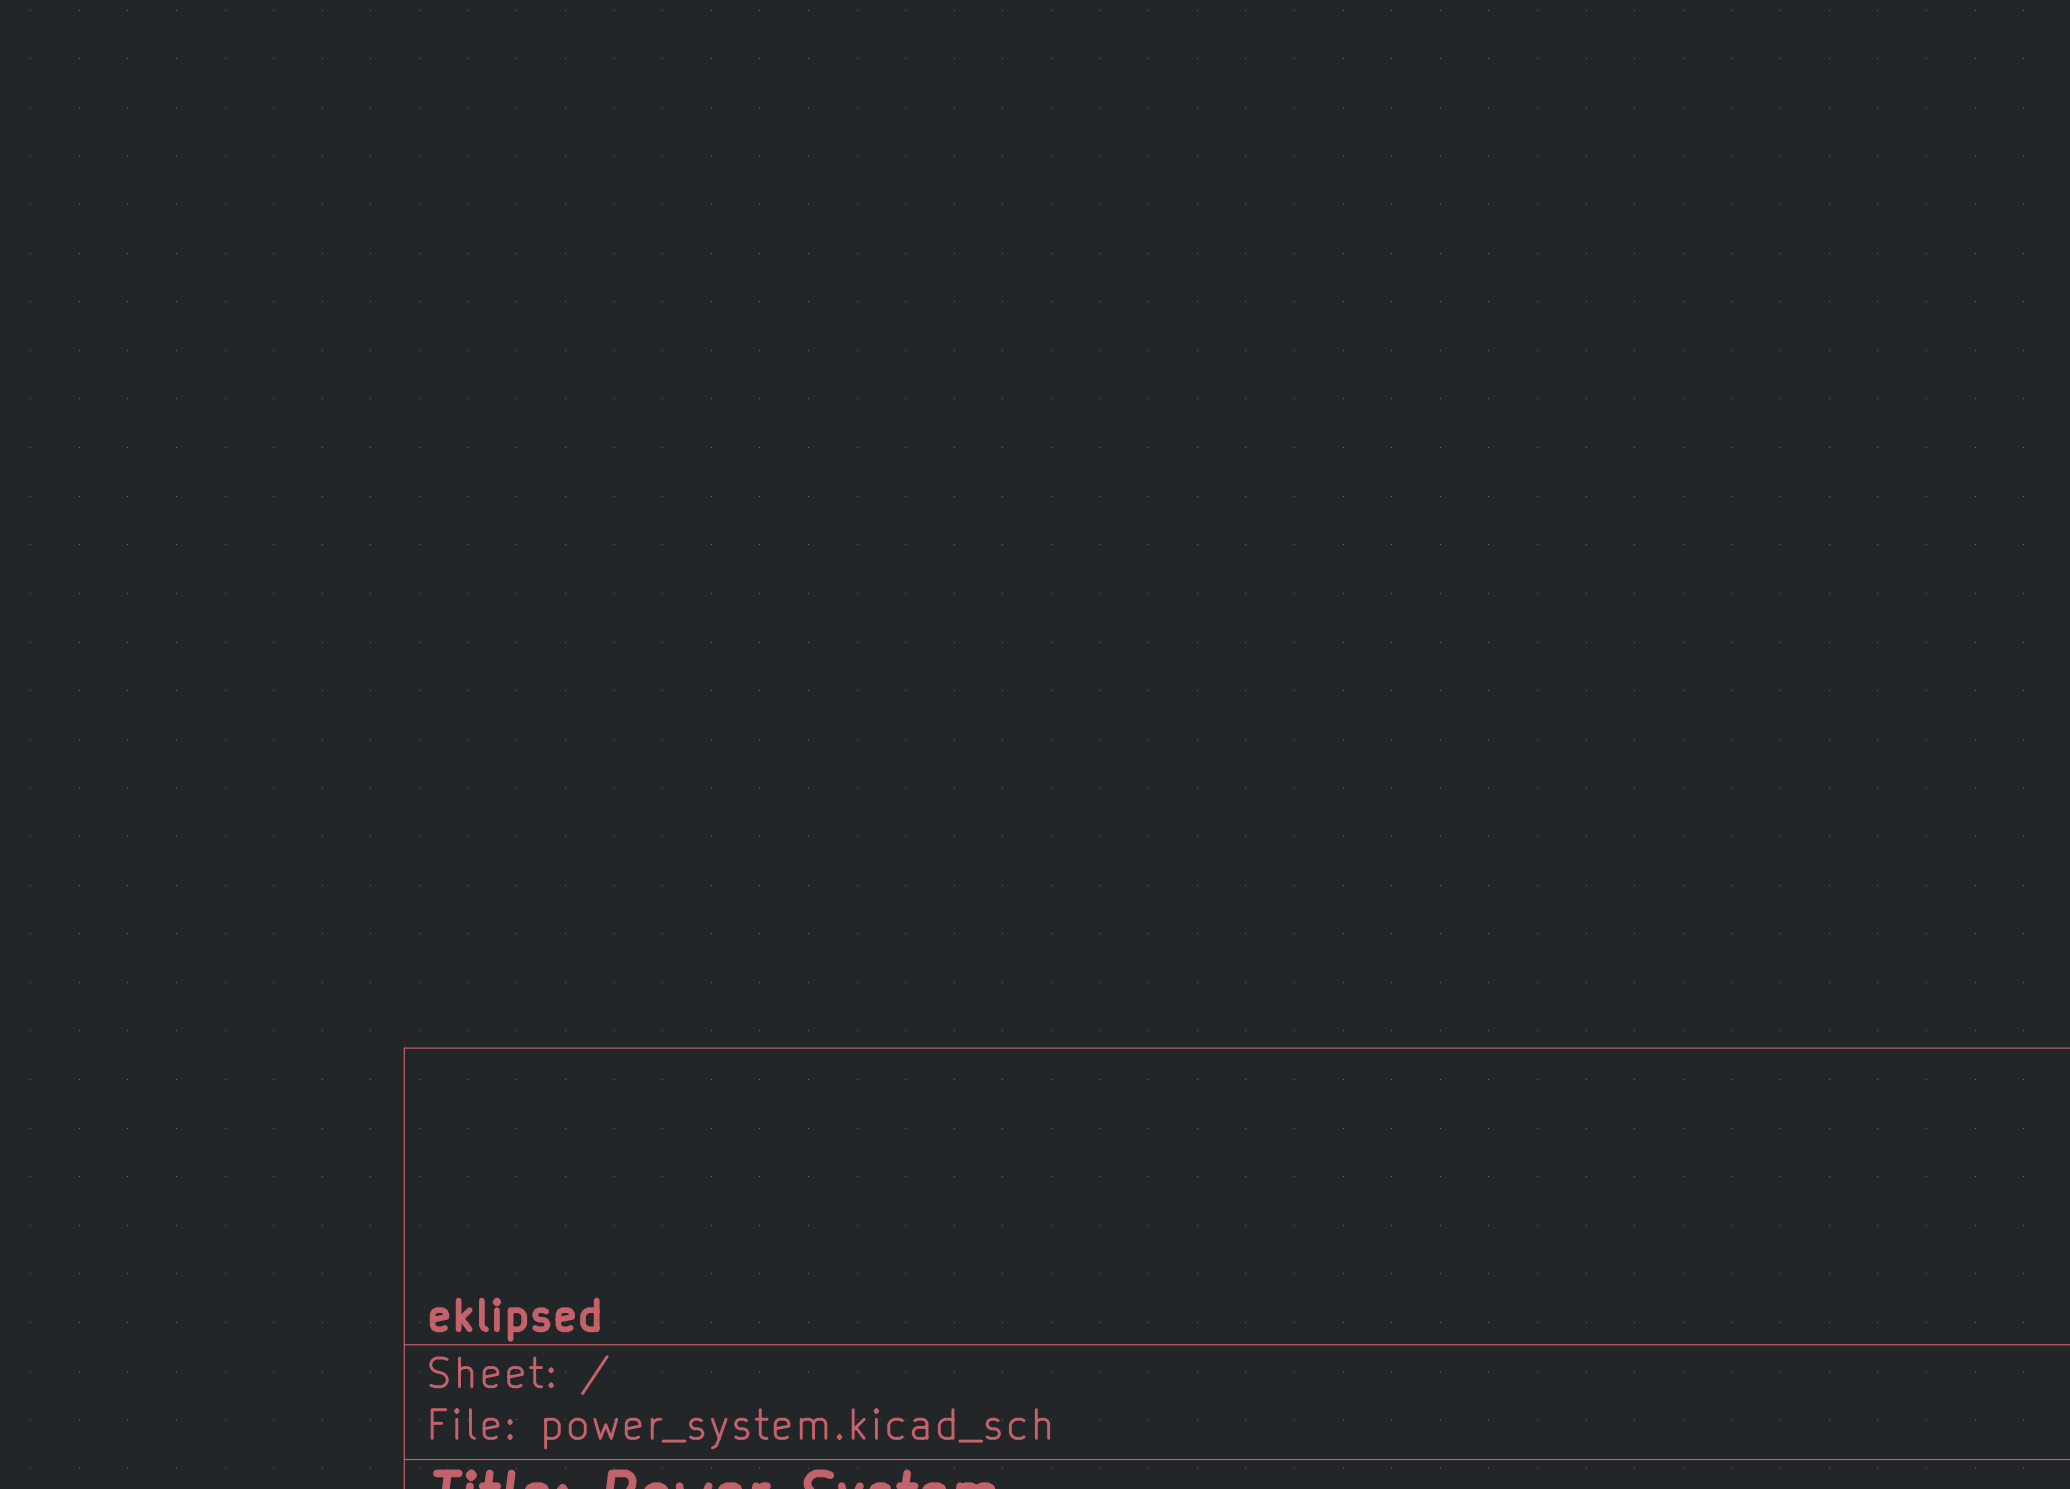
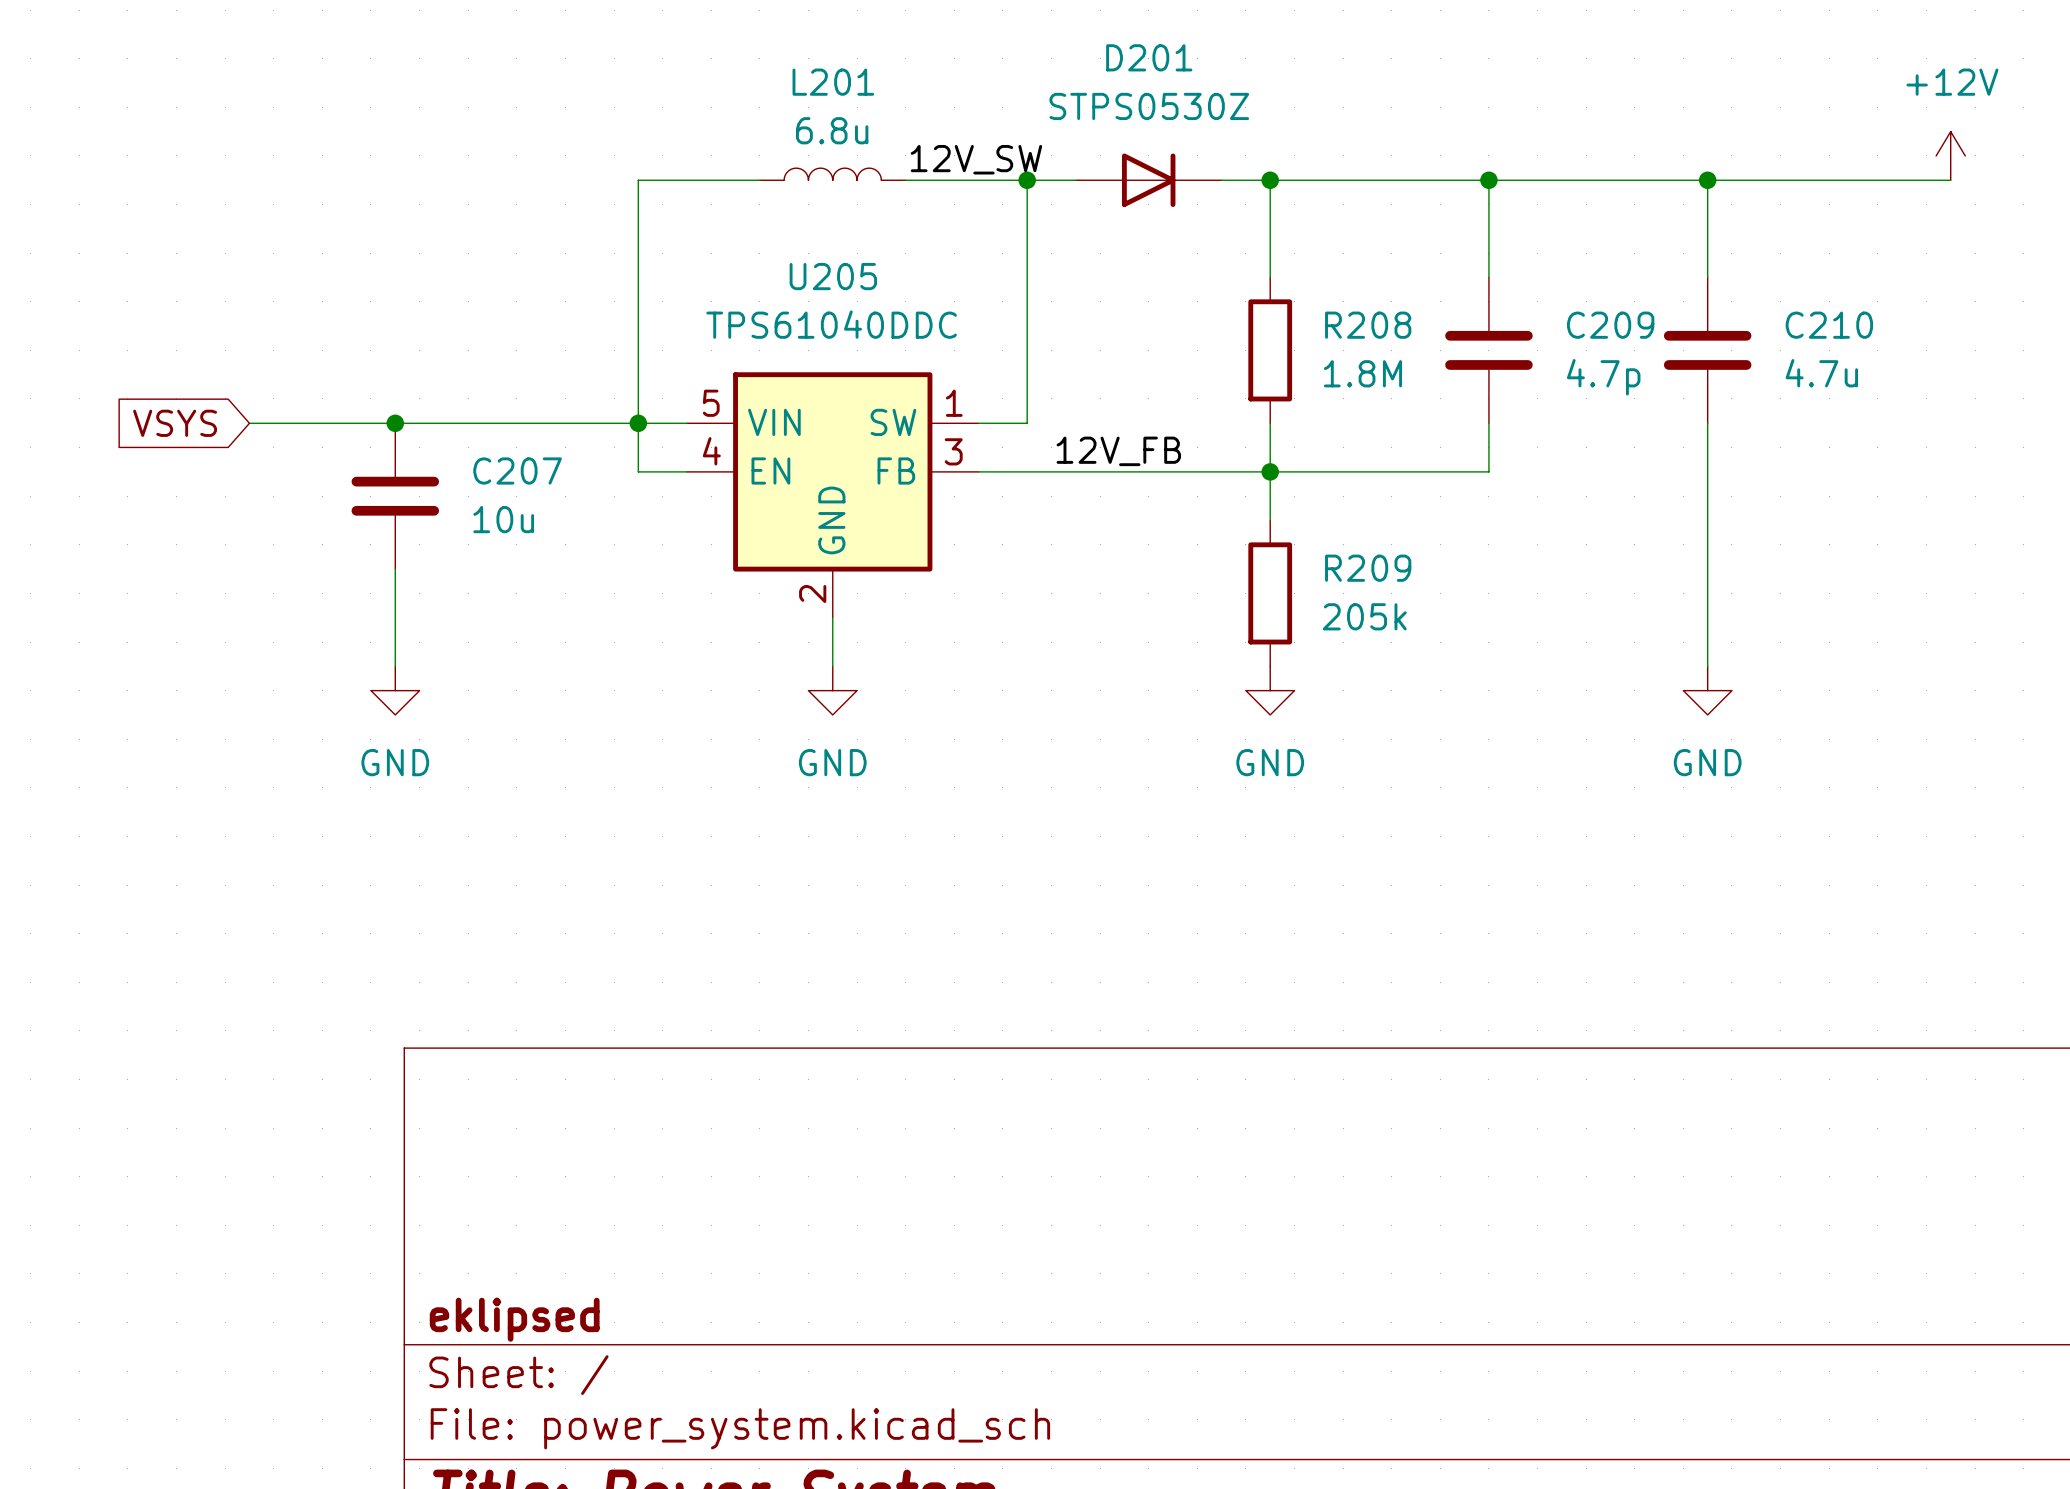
power symbol: none -> +12V (1950, 155)
label: none -> 12V_SW (976, 159)
L201: none -> 6.8u (832, 174)
wire: none -> (759, 180) (638, 180) (638, 471) (686, 471)
wire: none -> (905, 180) (1075, 180)
wire: none -> (1027, 180) (1027, 423) (978, 423)
junction: none -> (1027, 180)
D201: none -> STPS0530Z (1148, 180)
wire: none -> (1221, 180) (1950, 180)
wire: none -> (1270, 180) (1270, 277)
junction: none -> (1270, 180)
wire: none -> (1488, 180) (1488, 277)
junction: none -> (1488, 180)
wire: none -> (1707, 180) (1707, 277)
junction: none -> (1707, 180)
R208: none -> 1.8M (1270, 350)
C209: none -> 4.7p (1488, 350)
C210: none -> 4.7u (1707, 350)
global label: none -> VSYS (175, 423)
wire: none -> (249, 423) (686, 423)
junction: none -> (395, 423)
junction: none -> (638, 423)
wire: none -> (1270, 423) (1270, 520)
wire: none -> (1488, 423) (1488, 471) (978, 471)
wire: none -> (1707, 423) (1707, 666)
label: none -> 12V_FB (1118, 451)
junction: none -> (1270, 471)
U205: none -> TPS61040DDC (832, 494)
C207: none -> 10u (395, 496)
wire: none -> (395, 569) (395, 666)
R209: none -> 205k (1270, 593)
wire: none -> (832, 617) (832, 666)
power symbol: none -> GND (395, 690)
power symbol: none -> GND (832, 690)
power symbol: none -> GND (1270, 690)
power symbol: none -> GND (1707, 690)

